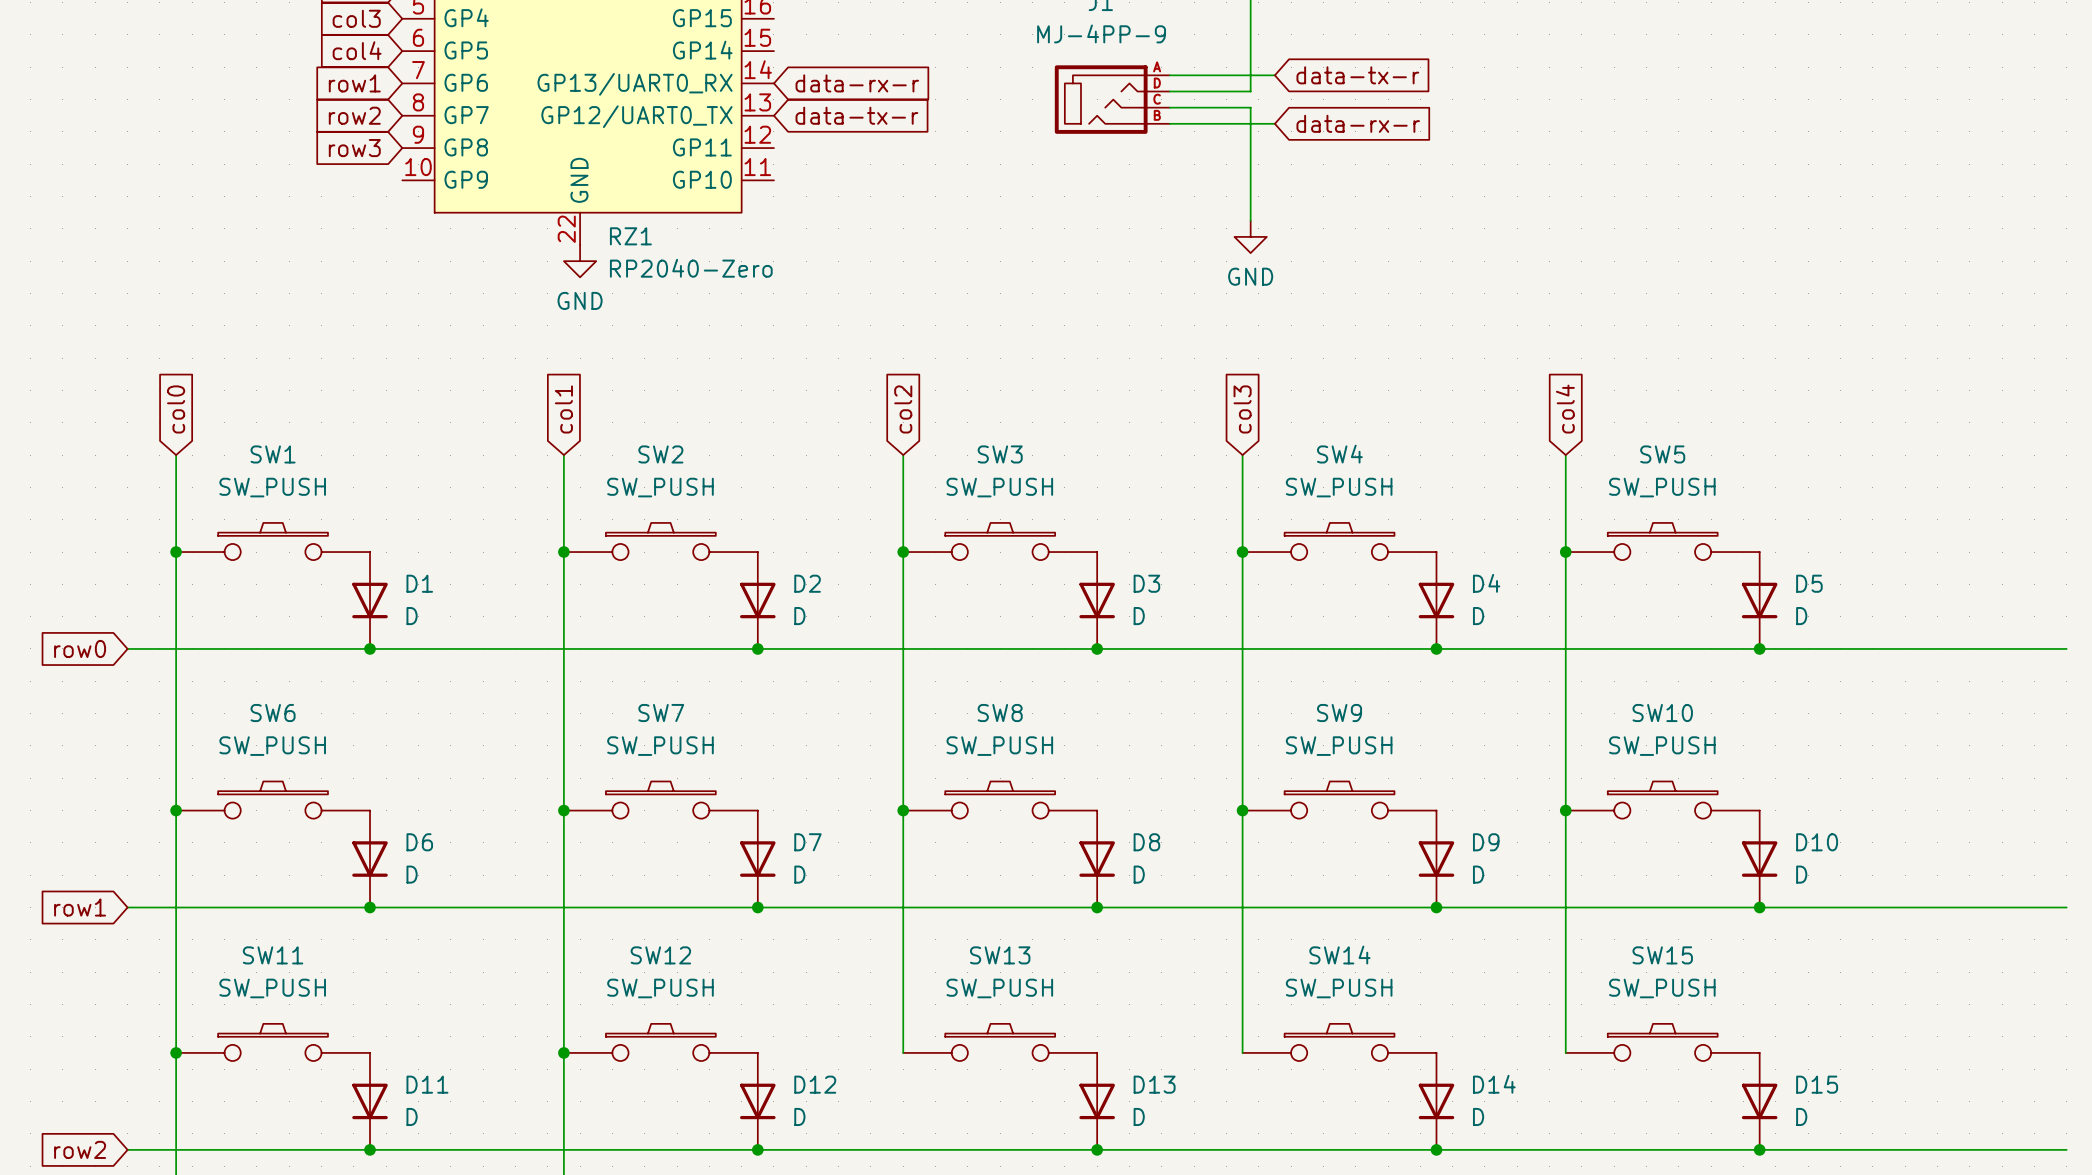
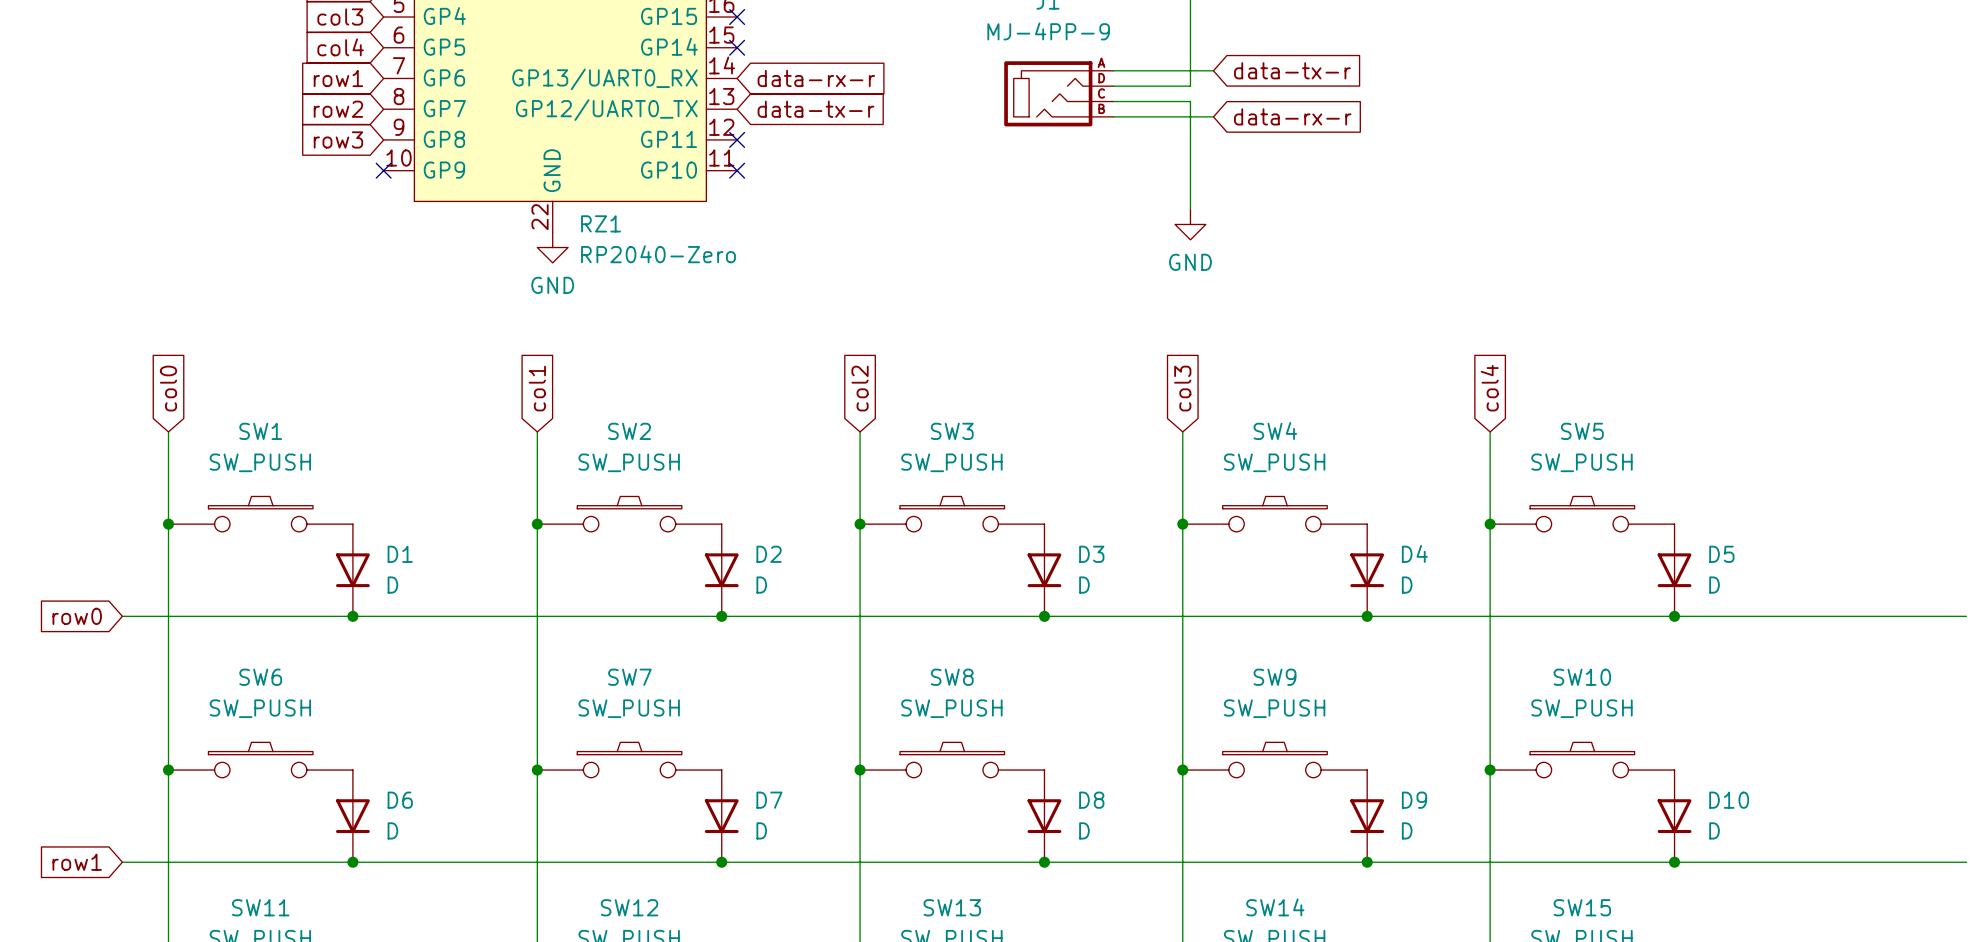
no-connect mark: none -> (737, 17)
no-connect mark: none -> (737, 47)
no-connect mark: none -> (737, 139)
no-connect mark: none -> (383, 170)
no-connect mark: none -> (737, 170)

